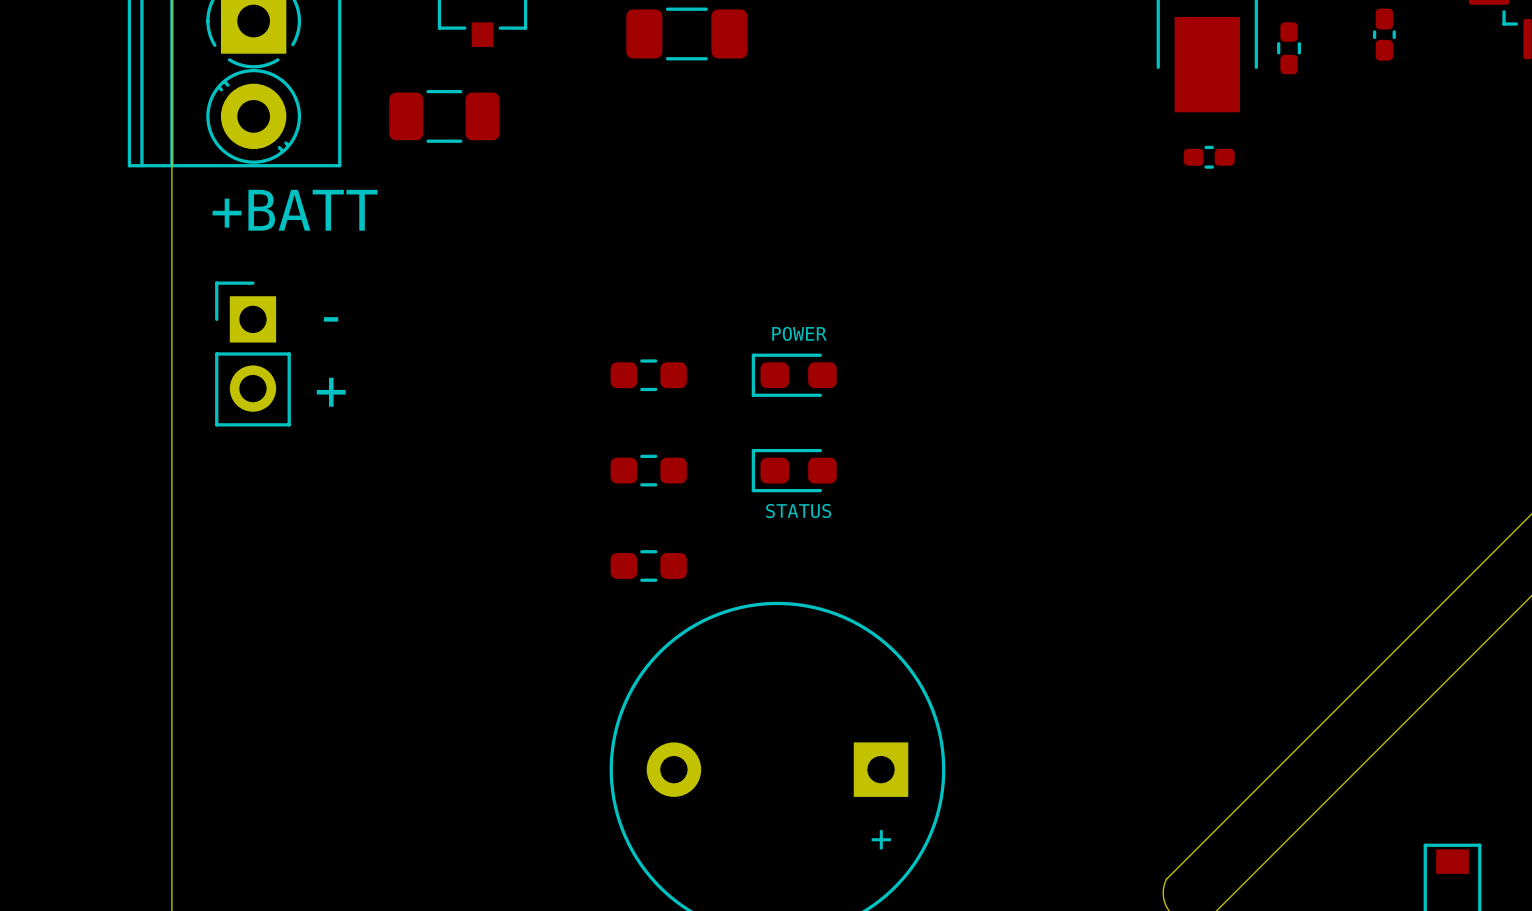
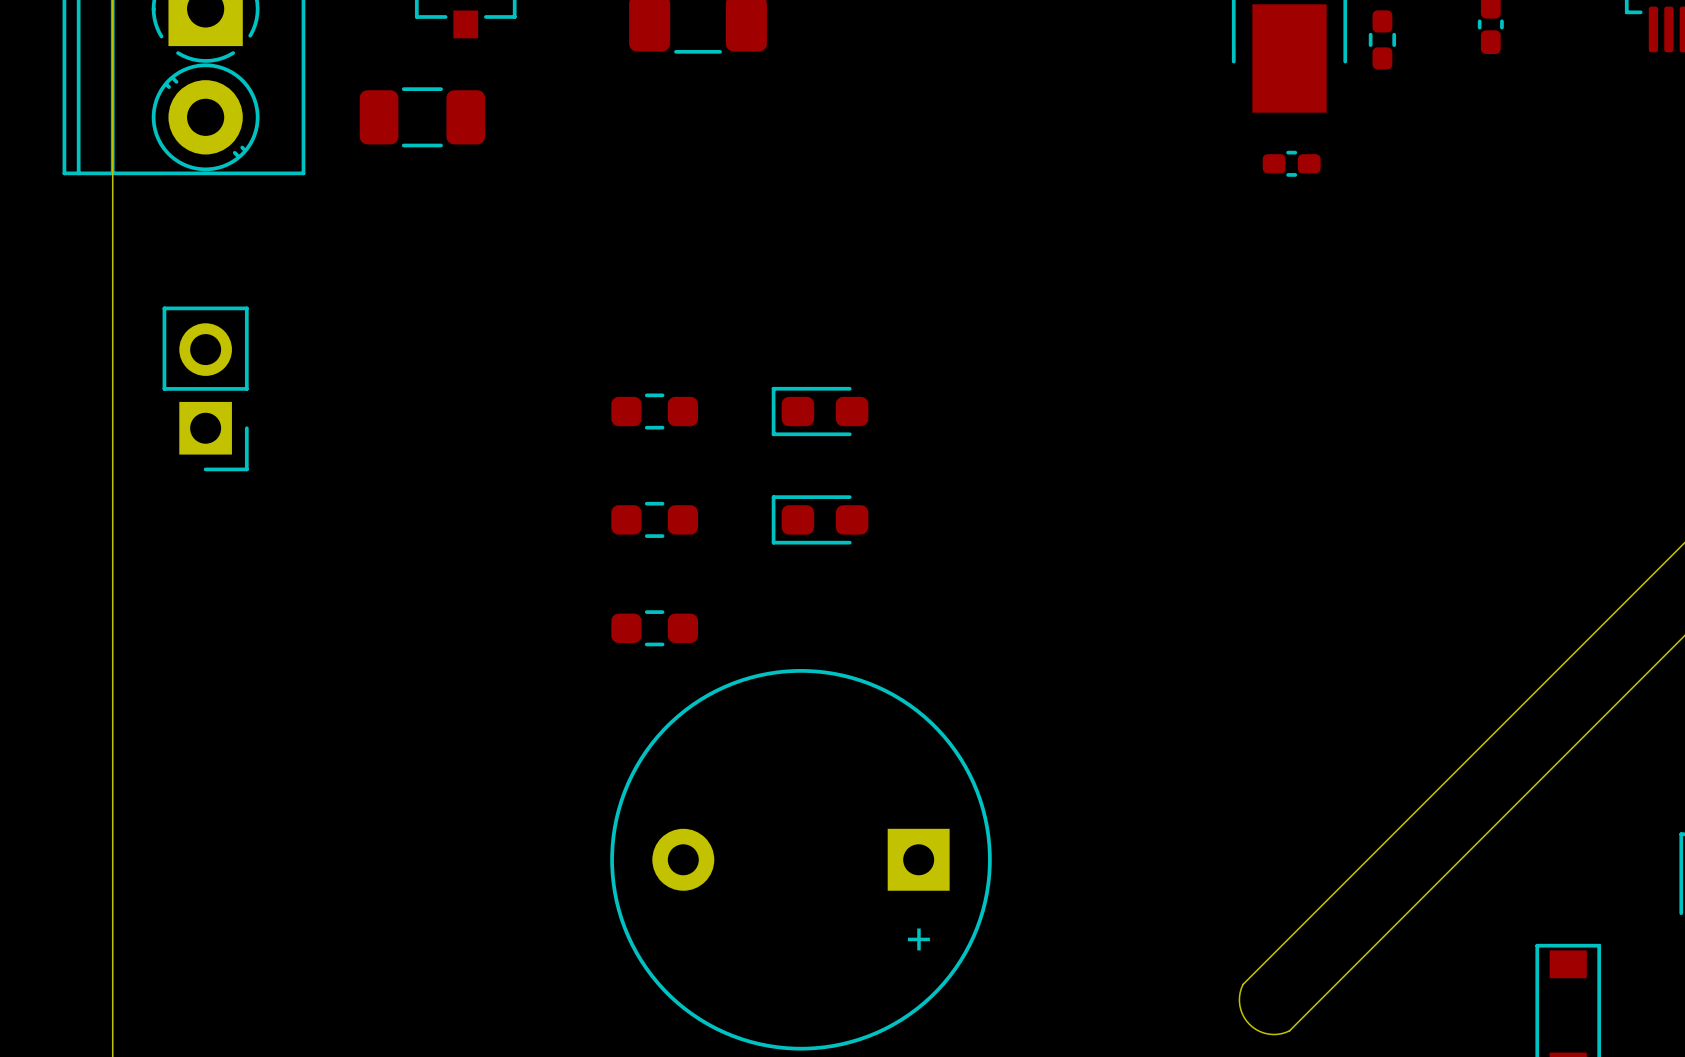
text: +BATT (295, 210) -> none
text: - (331, 319) -> none
text: POWER (799, 333) -> none
part rotation: 0° (252, 353) -> 180° (205, 388)
text: + (331, 392) -> none
text: STATUS (798, 510) -> none

